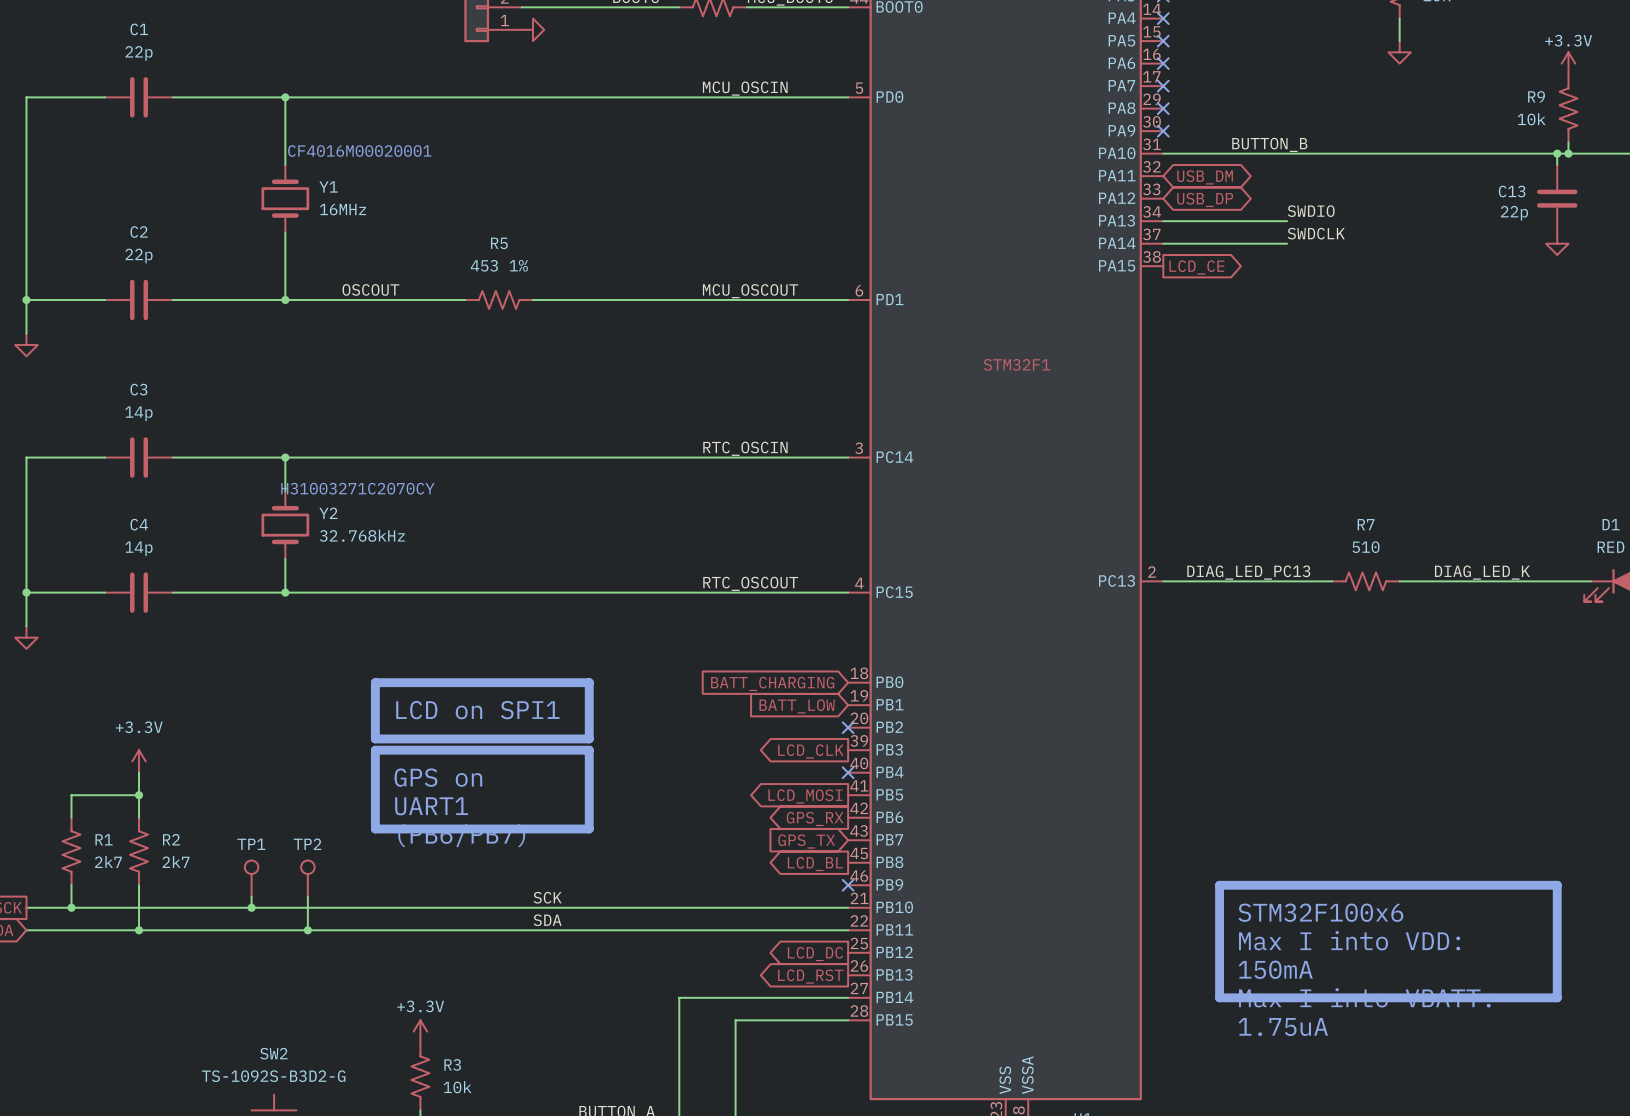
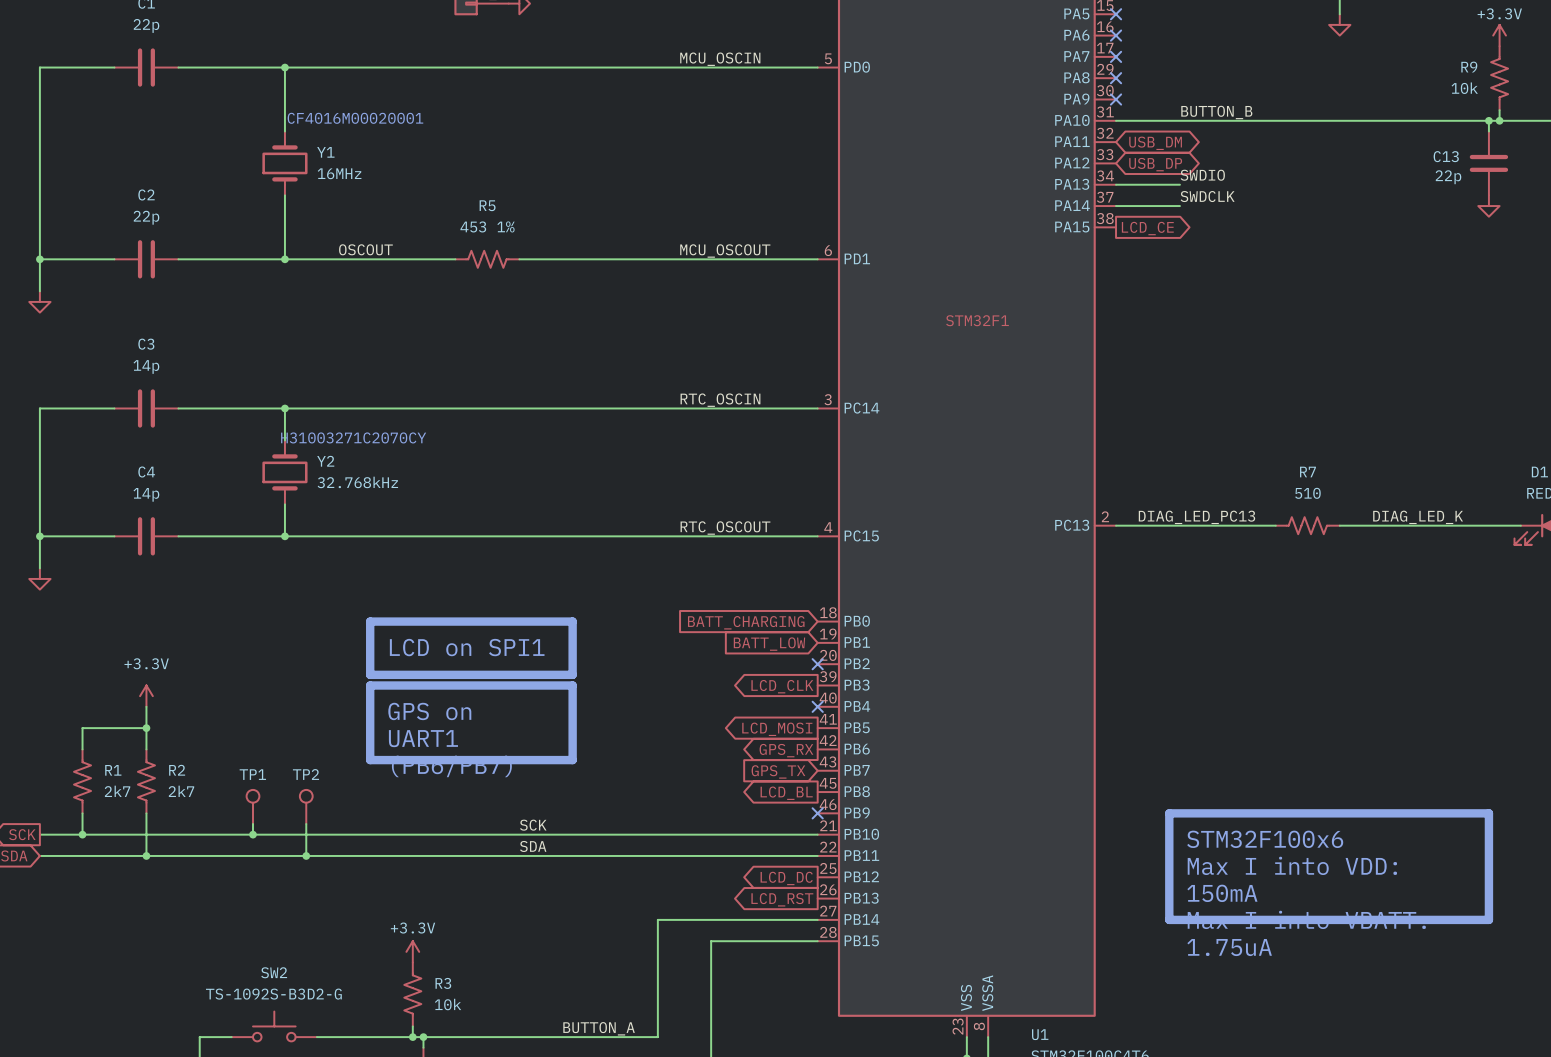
label position: SWDIO (1311, 211) -> SWDIO (1202, 175)
wire: (1230, 221) (1287, 221) -> none
label position: SWDCLK (1316, 233) -> SWDCLK (1207, 196)
wire: (1230, 243) (1287, 243) -> none

